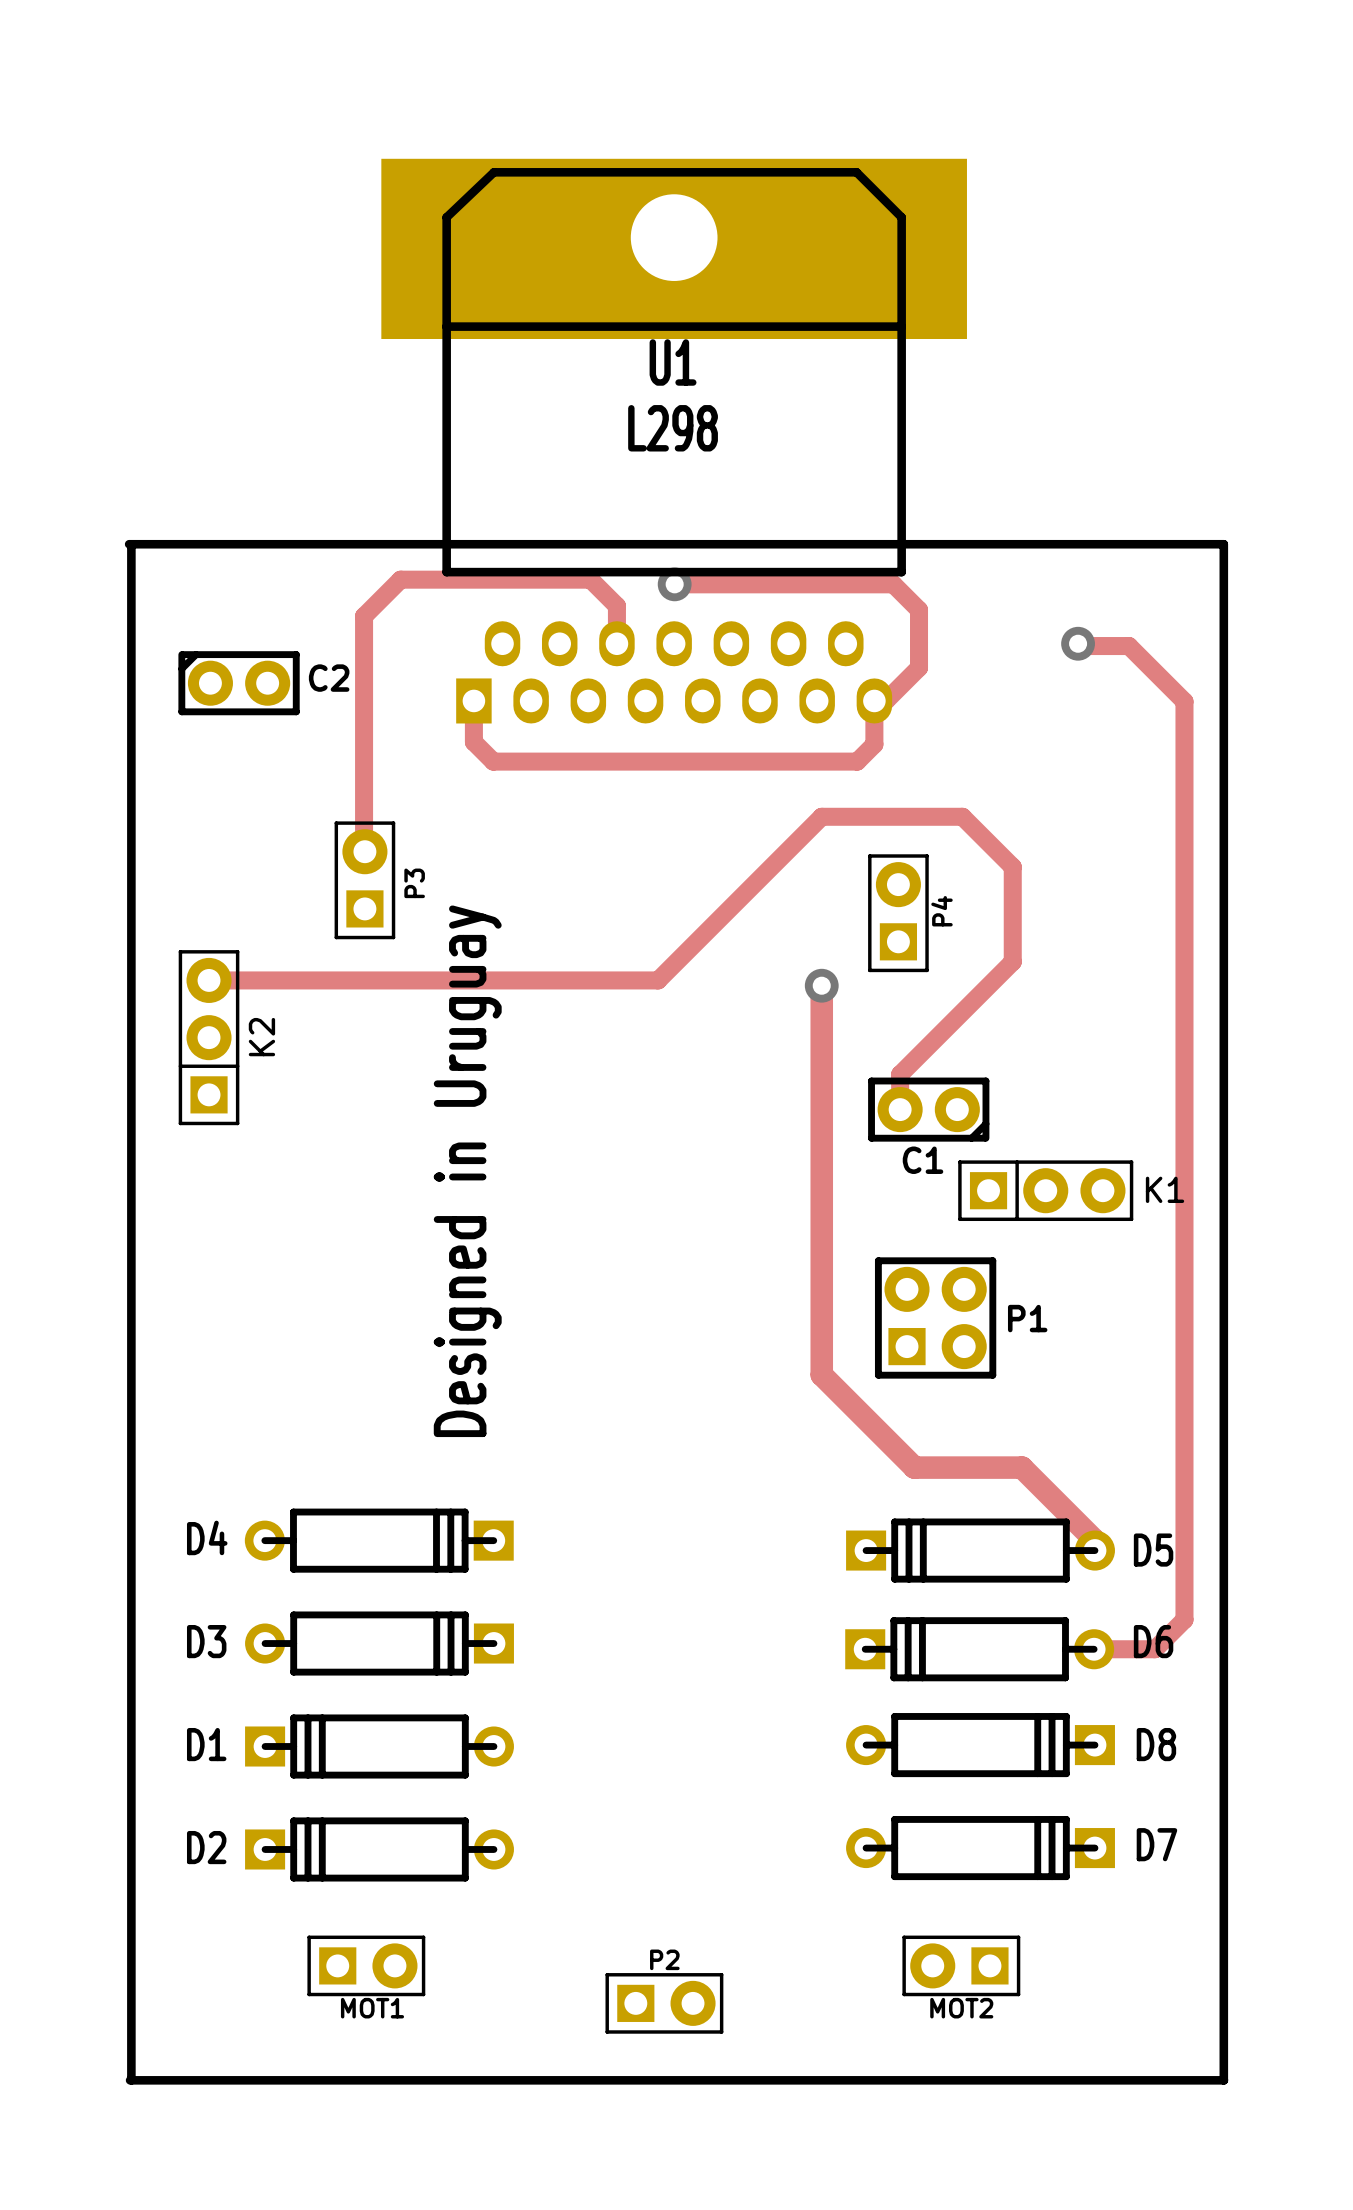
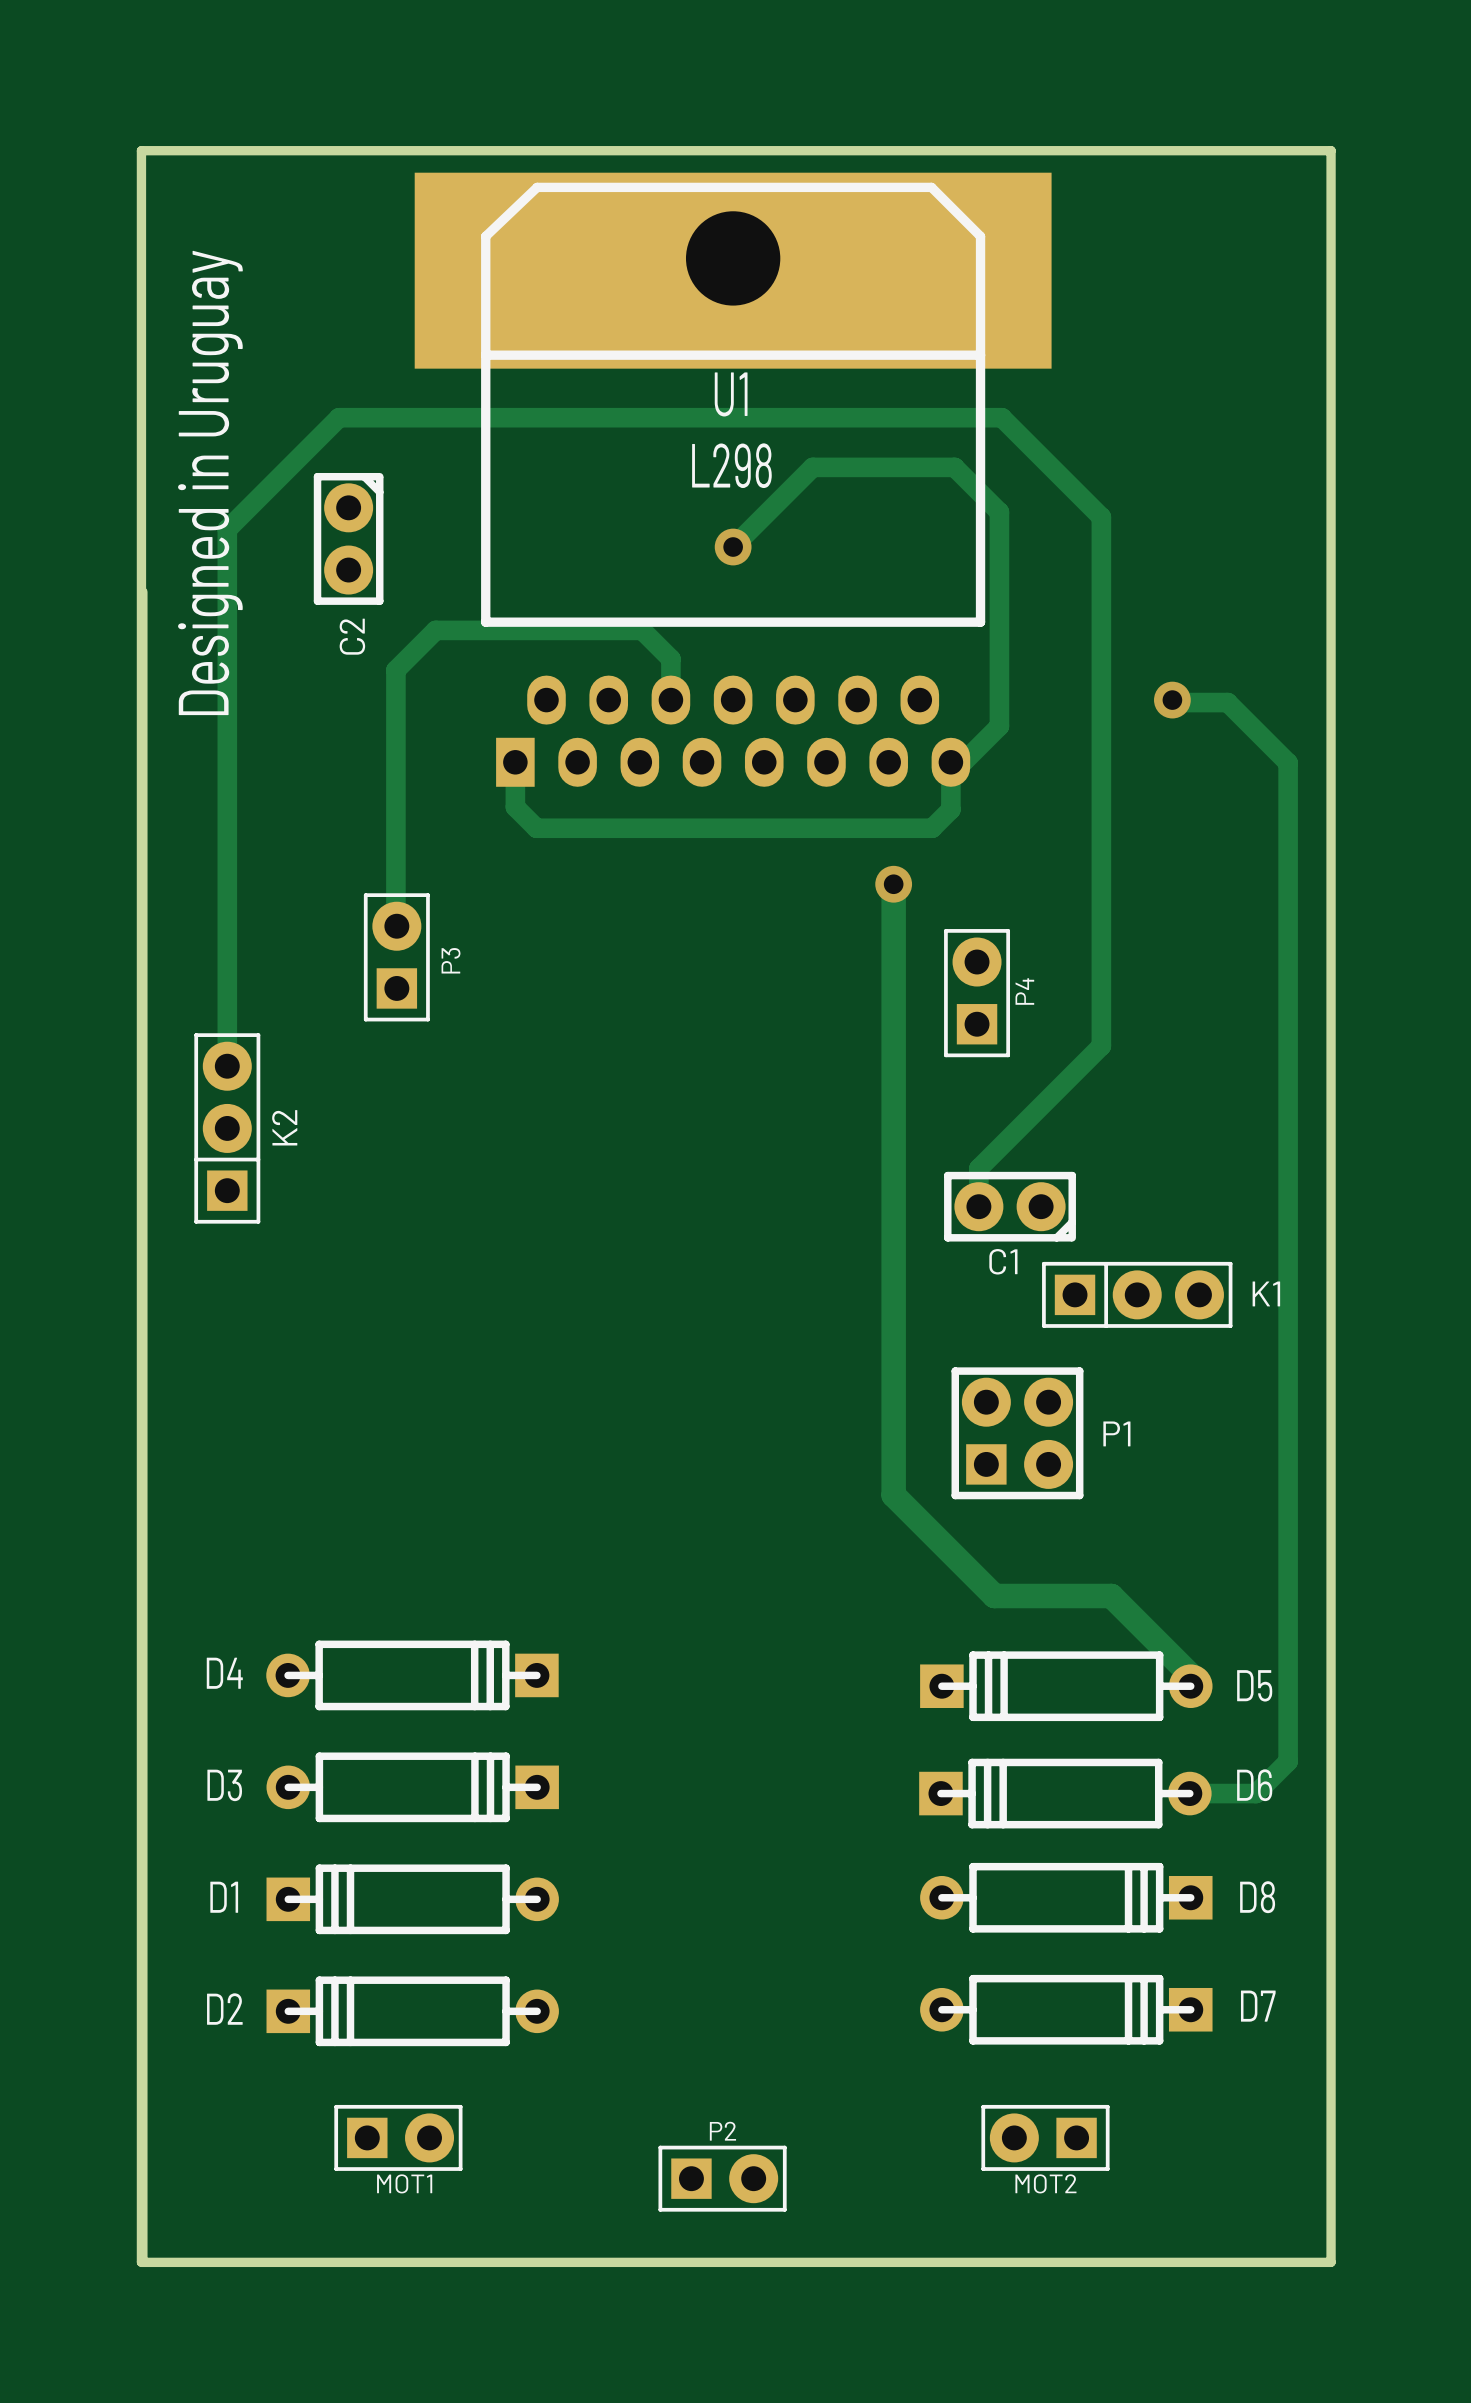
text: none -> Designed in Uruguay (210, 482)
board edge: (129, 544) (1223, 544) (1223, 2080) -> (141, 2262) (141, 150) (1331, 150) (1331, 2262)
track: (674, 584) (893, 584) (919, 609) -> (733, 547) (812, 467) (954, 467) (999, 512) (999, 663)
via position: (674, 584) -> (733, 547)
C2 rotation: 0° (239, 683) -> 90° clockwise (348, 538)
C2 position: (239, 683) -> (348, 538)
track: none -> (893, 884) (893, 1071)
via: none -> (893, 884)
track: (1012, 867) (962, 816) (821, 816) (658, 980) (209, 980) -> (1101, 942) (1101, 517) (1001, 417) (339, 417) (227, 529) (227, 1066)
via: (821, 985) -> none
text: Designed in Uruguay (467, 1171) -> none

